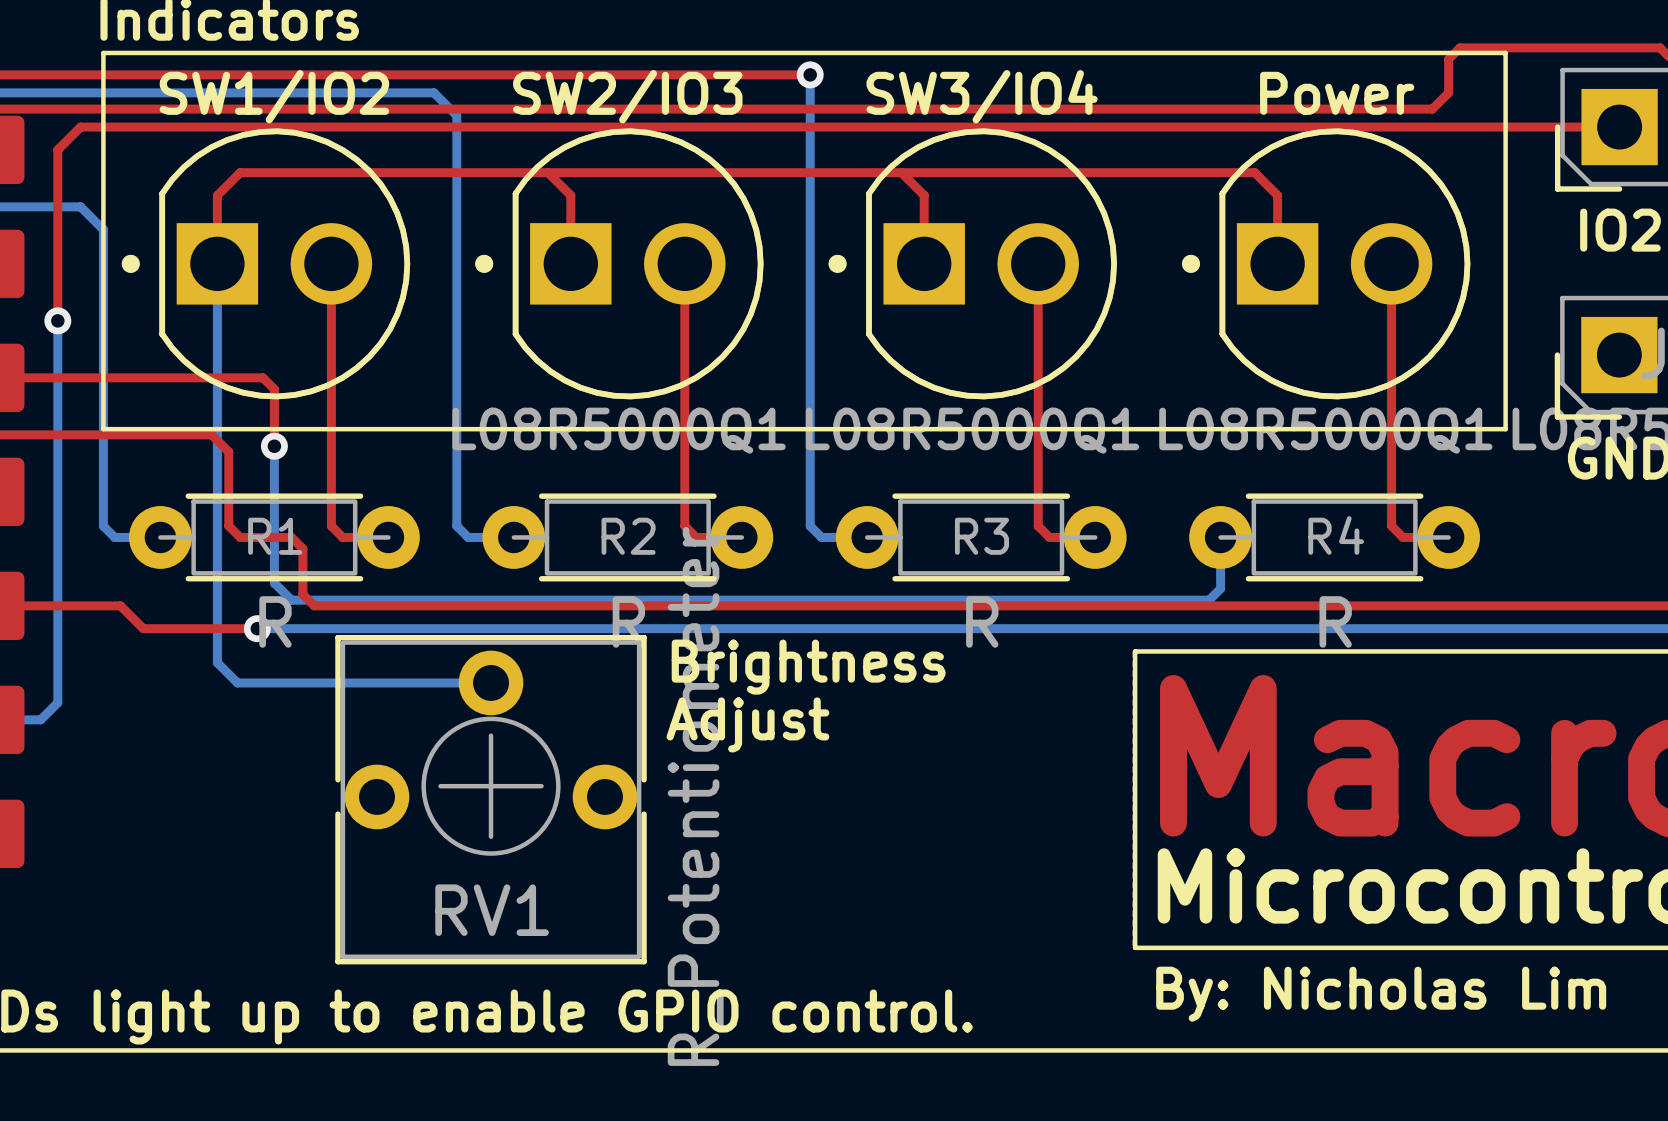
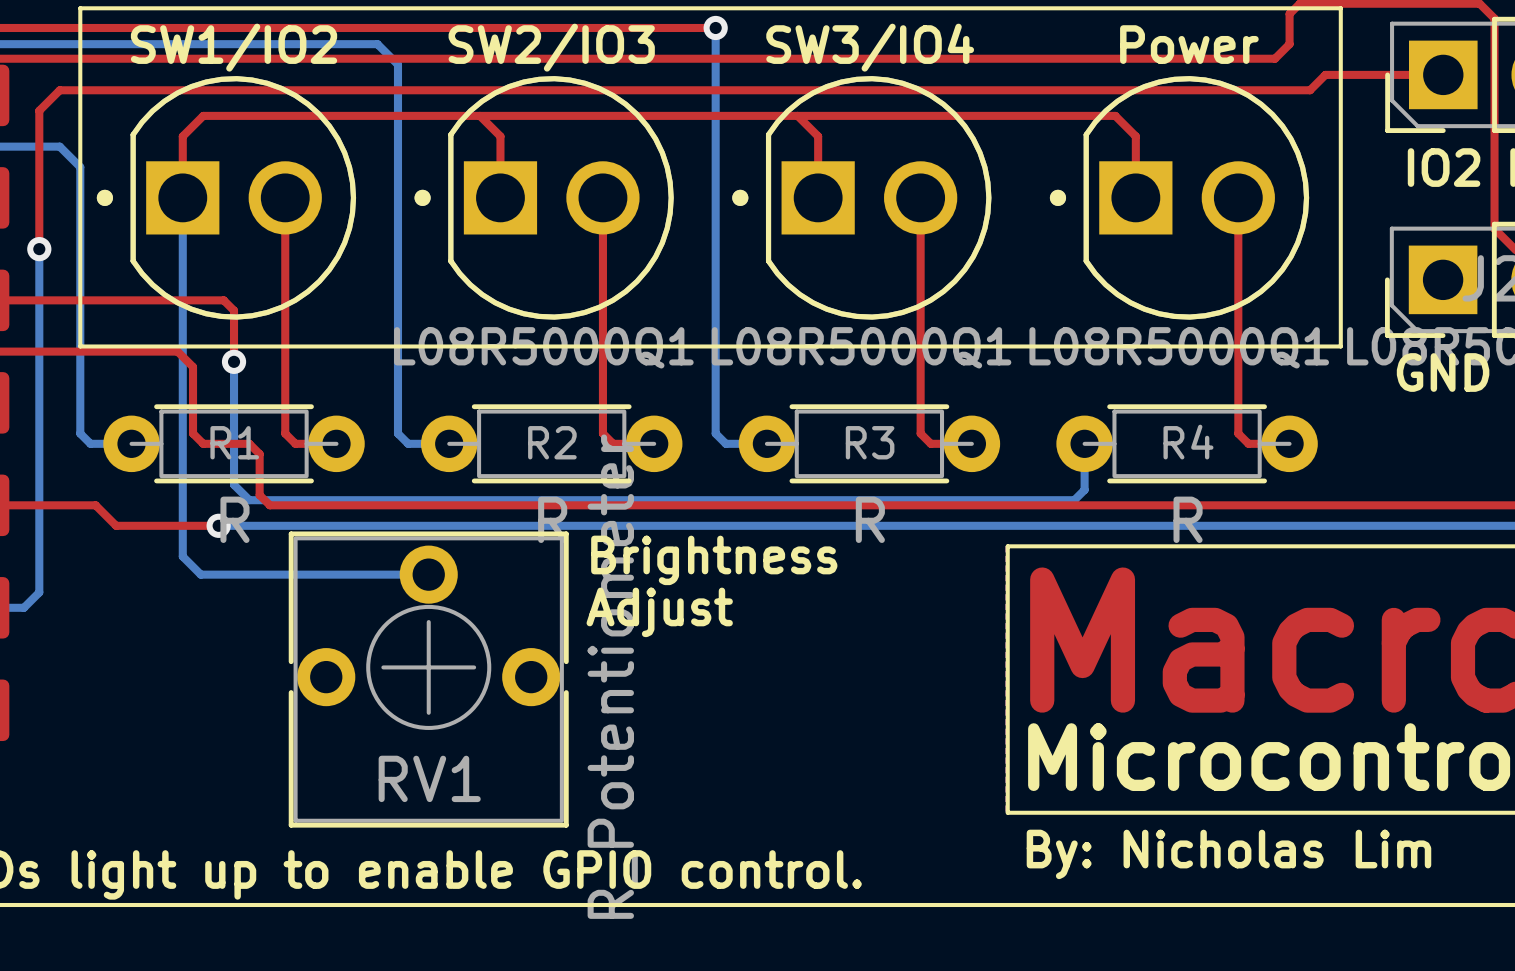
top track: (1488, 127) (80, 127) (57, 149) (57, 166) -> (1325, 74) (1310, 90) (59, 90) (39, 110)

